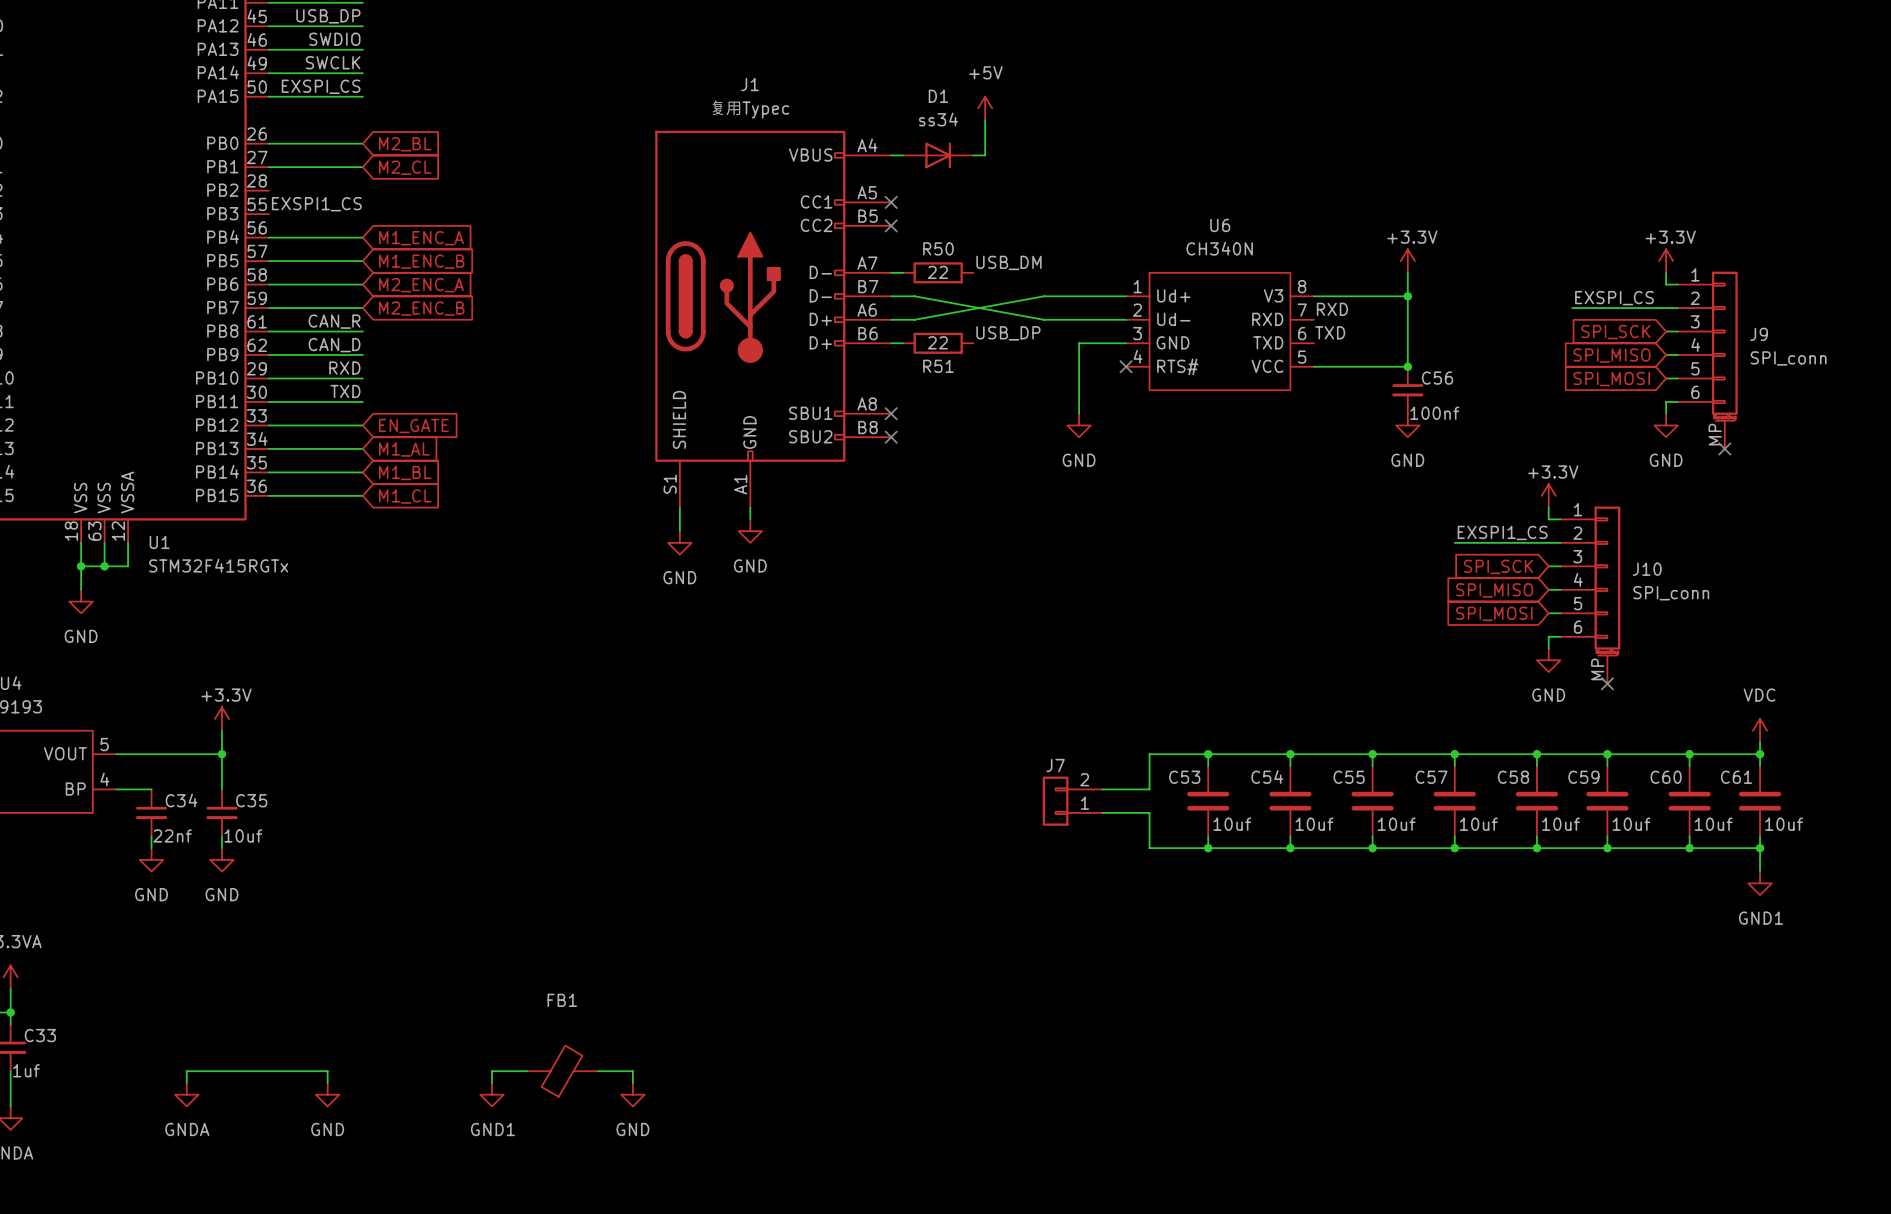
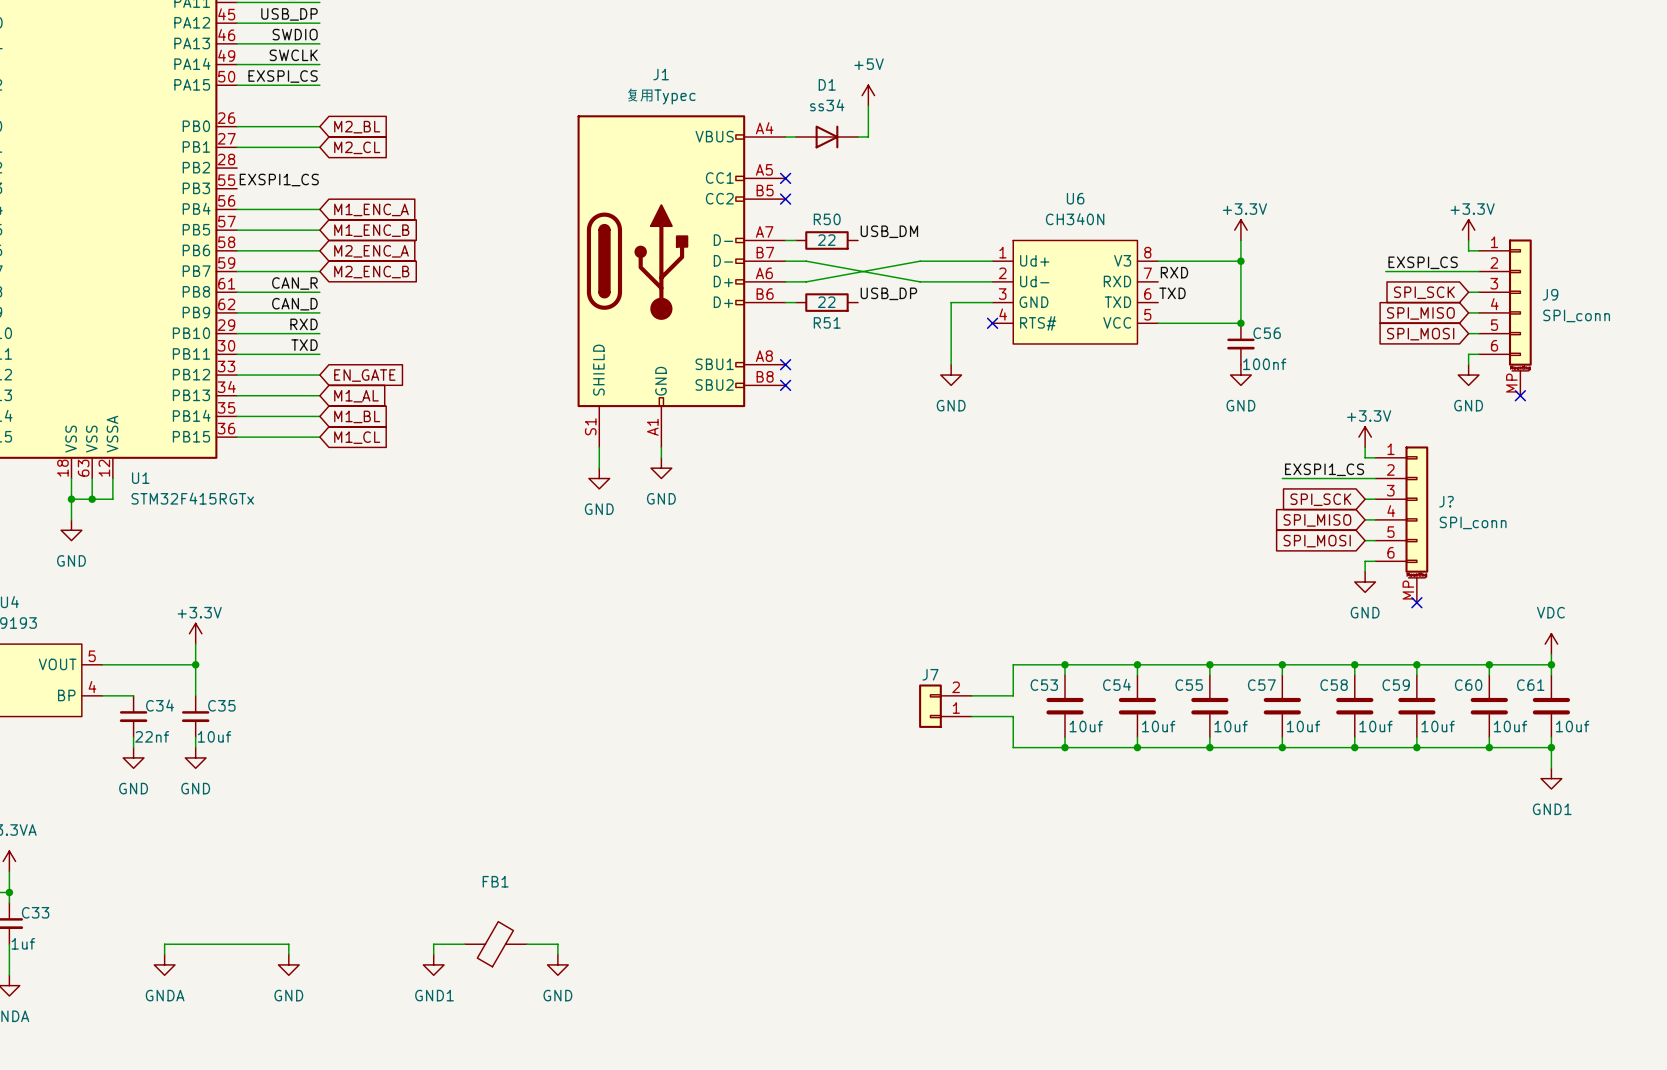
J10 name: J10 (1647, 569) -> J? (1446, 501)

